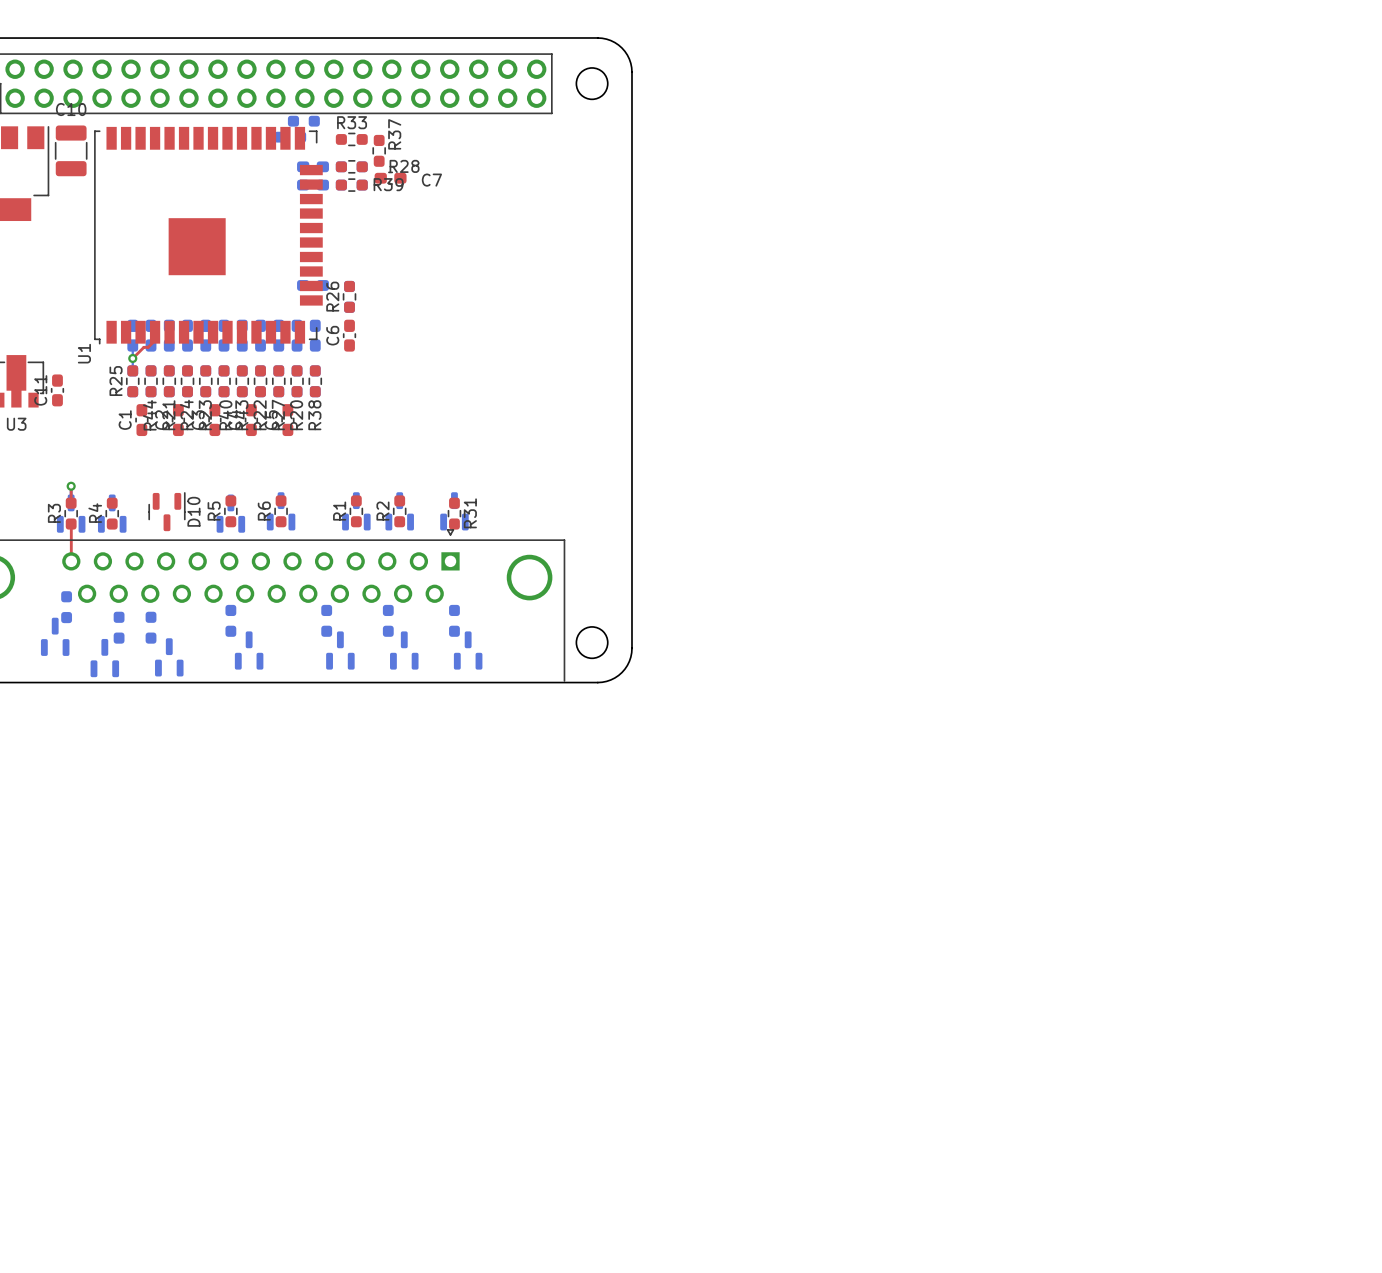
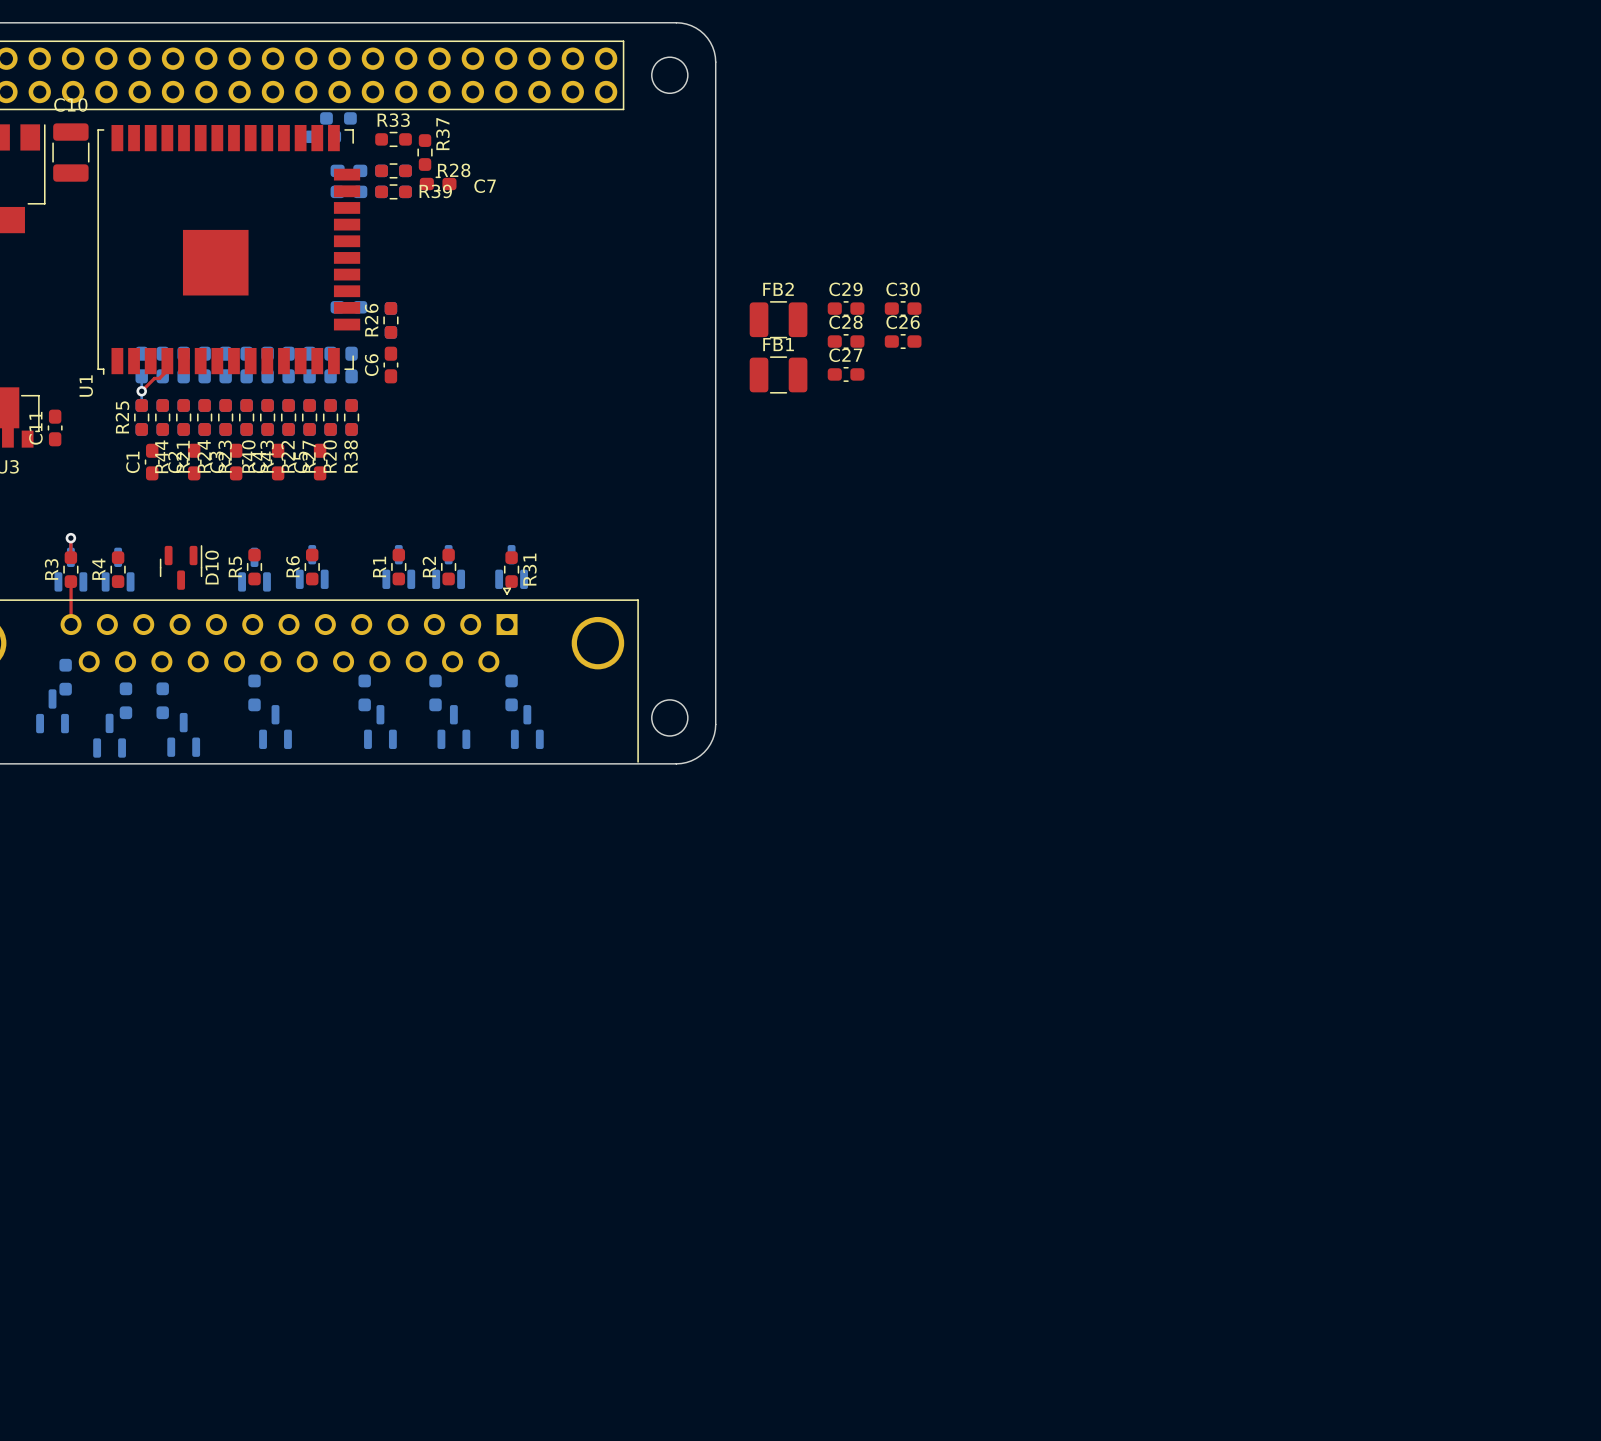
C29: none -> (846, 308)
C30: none -> (903, 308)
FB2: none -> (778, 319)
C28: none -> (846, 341)
C26: none -> (903, 341)
C27: none -> (846, 374)
FB1: none -> (778, 374)

